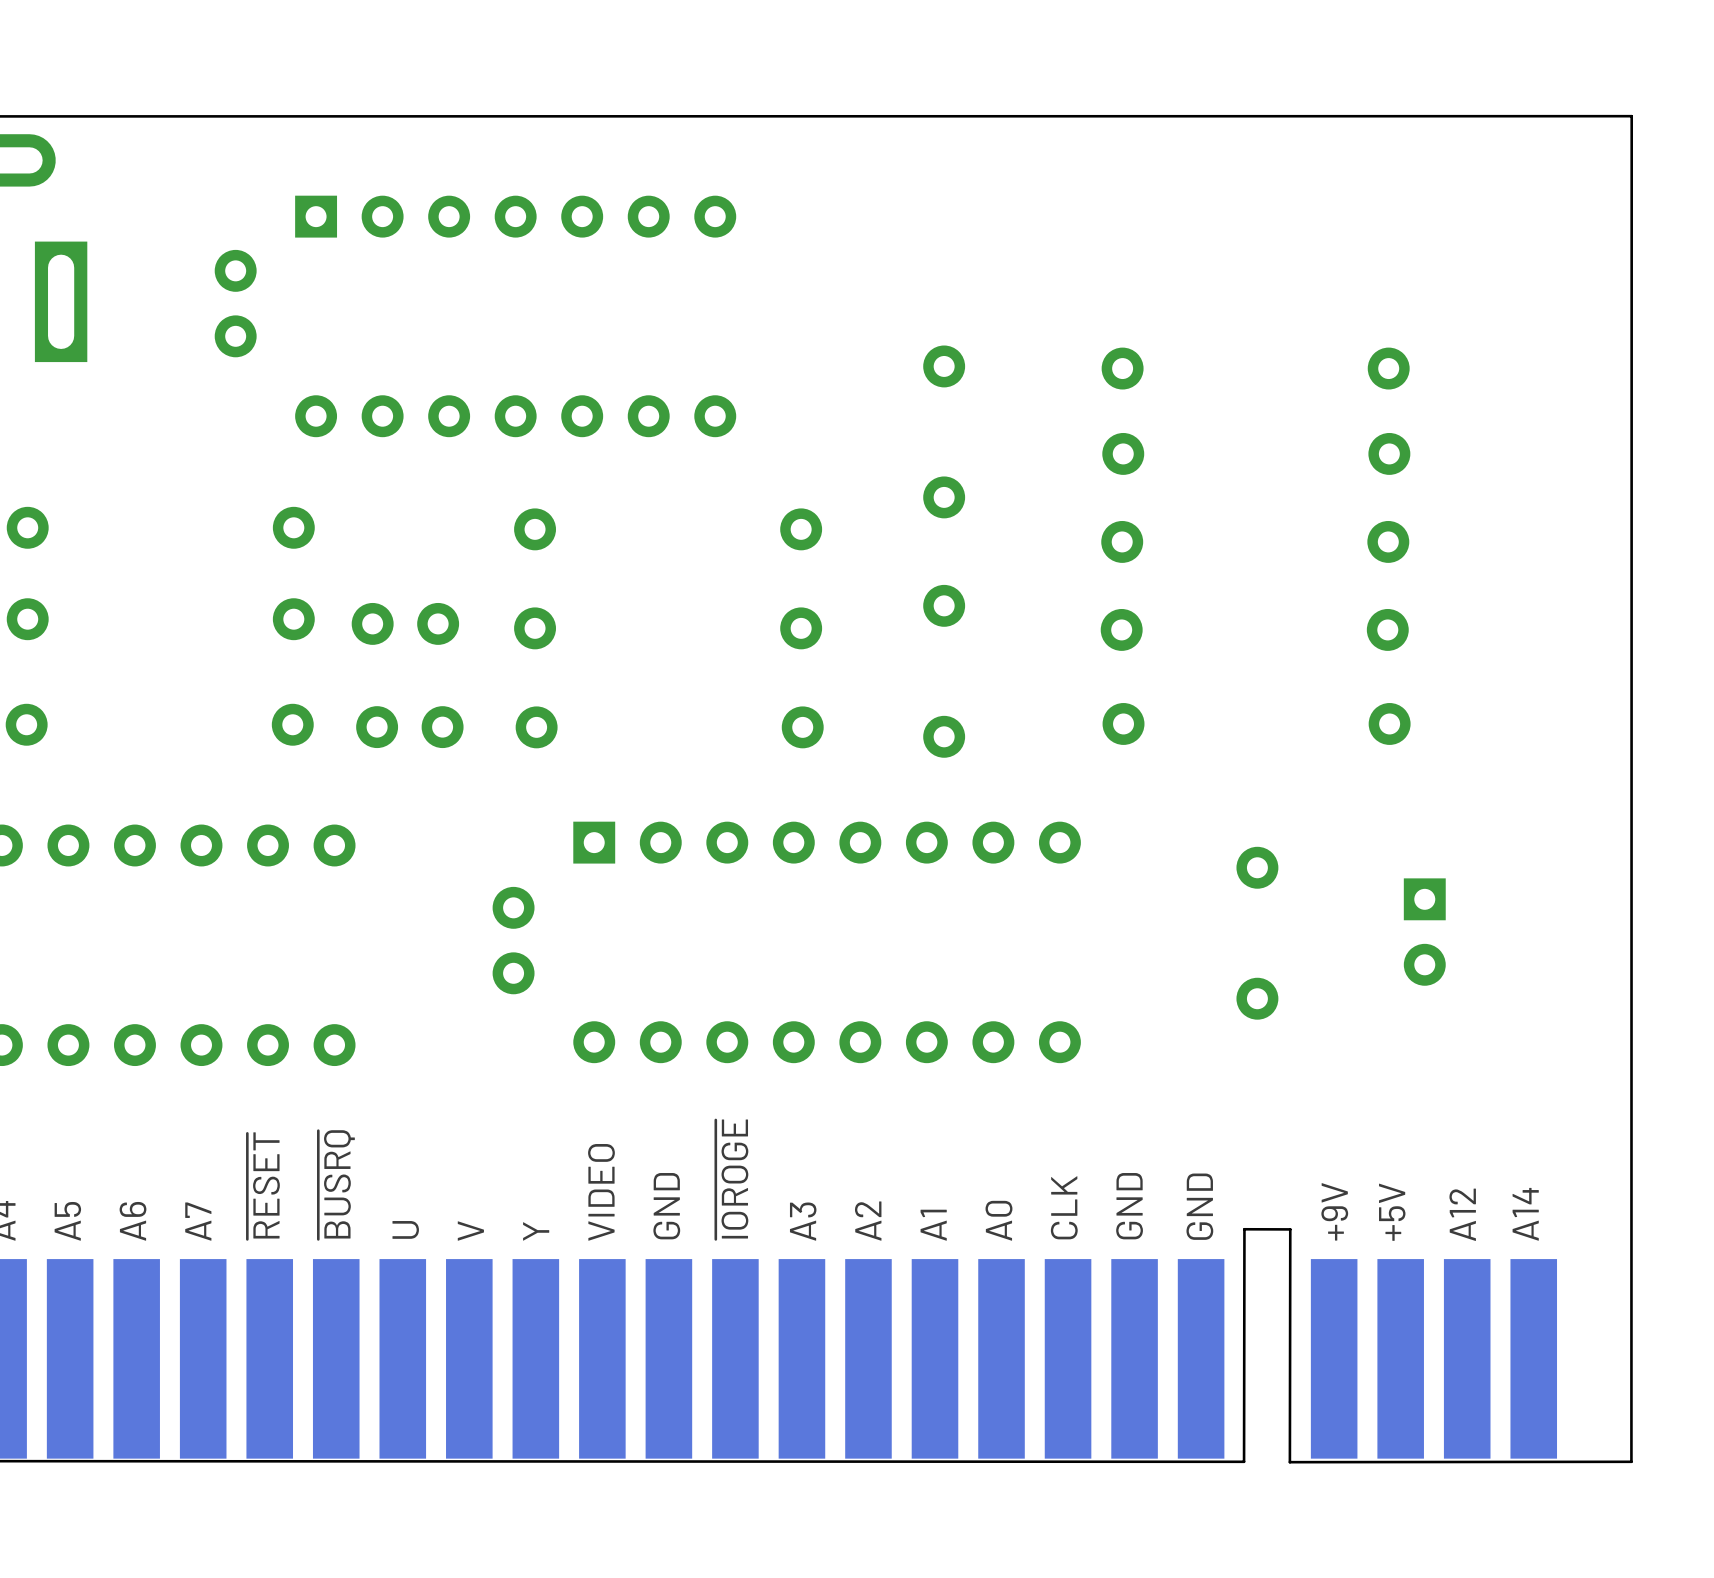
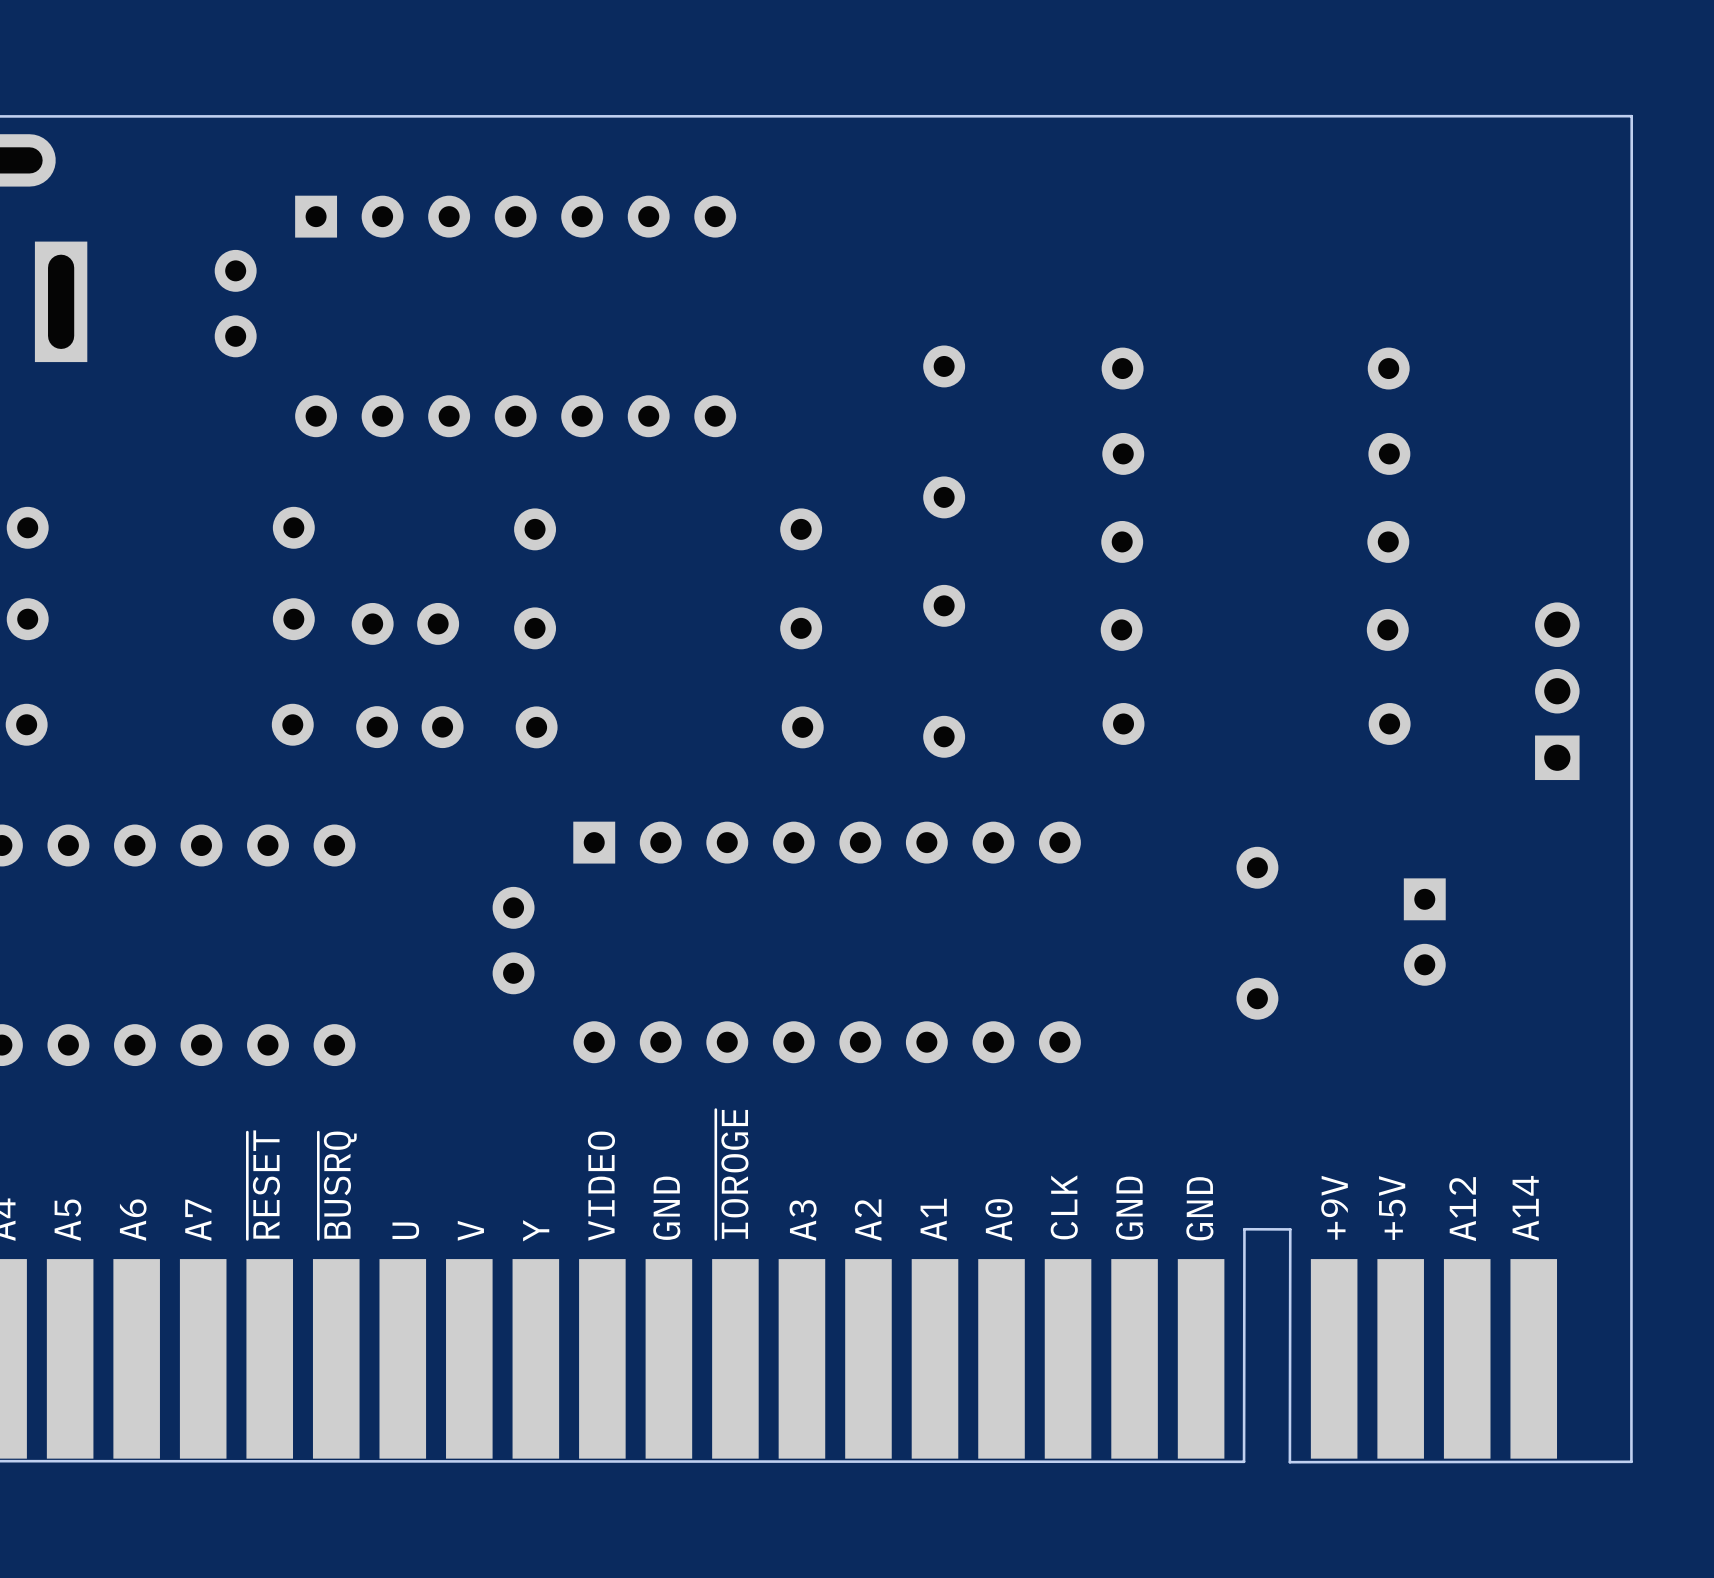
part: none -> (1557, 691)

